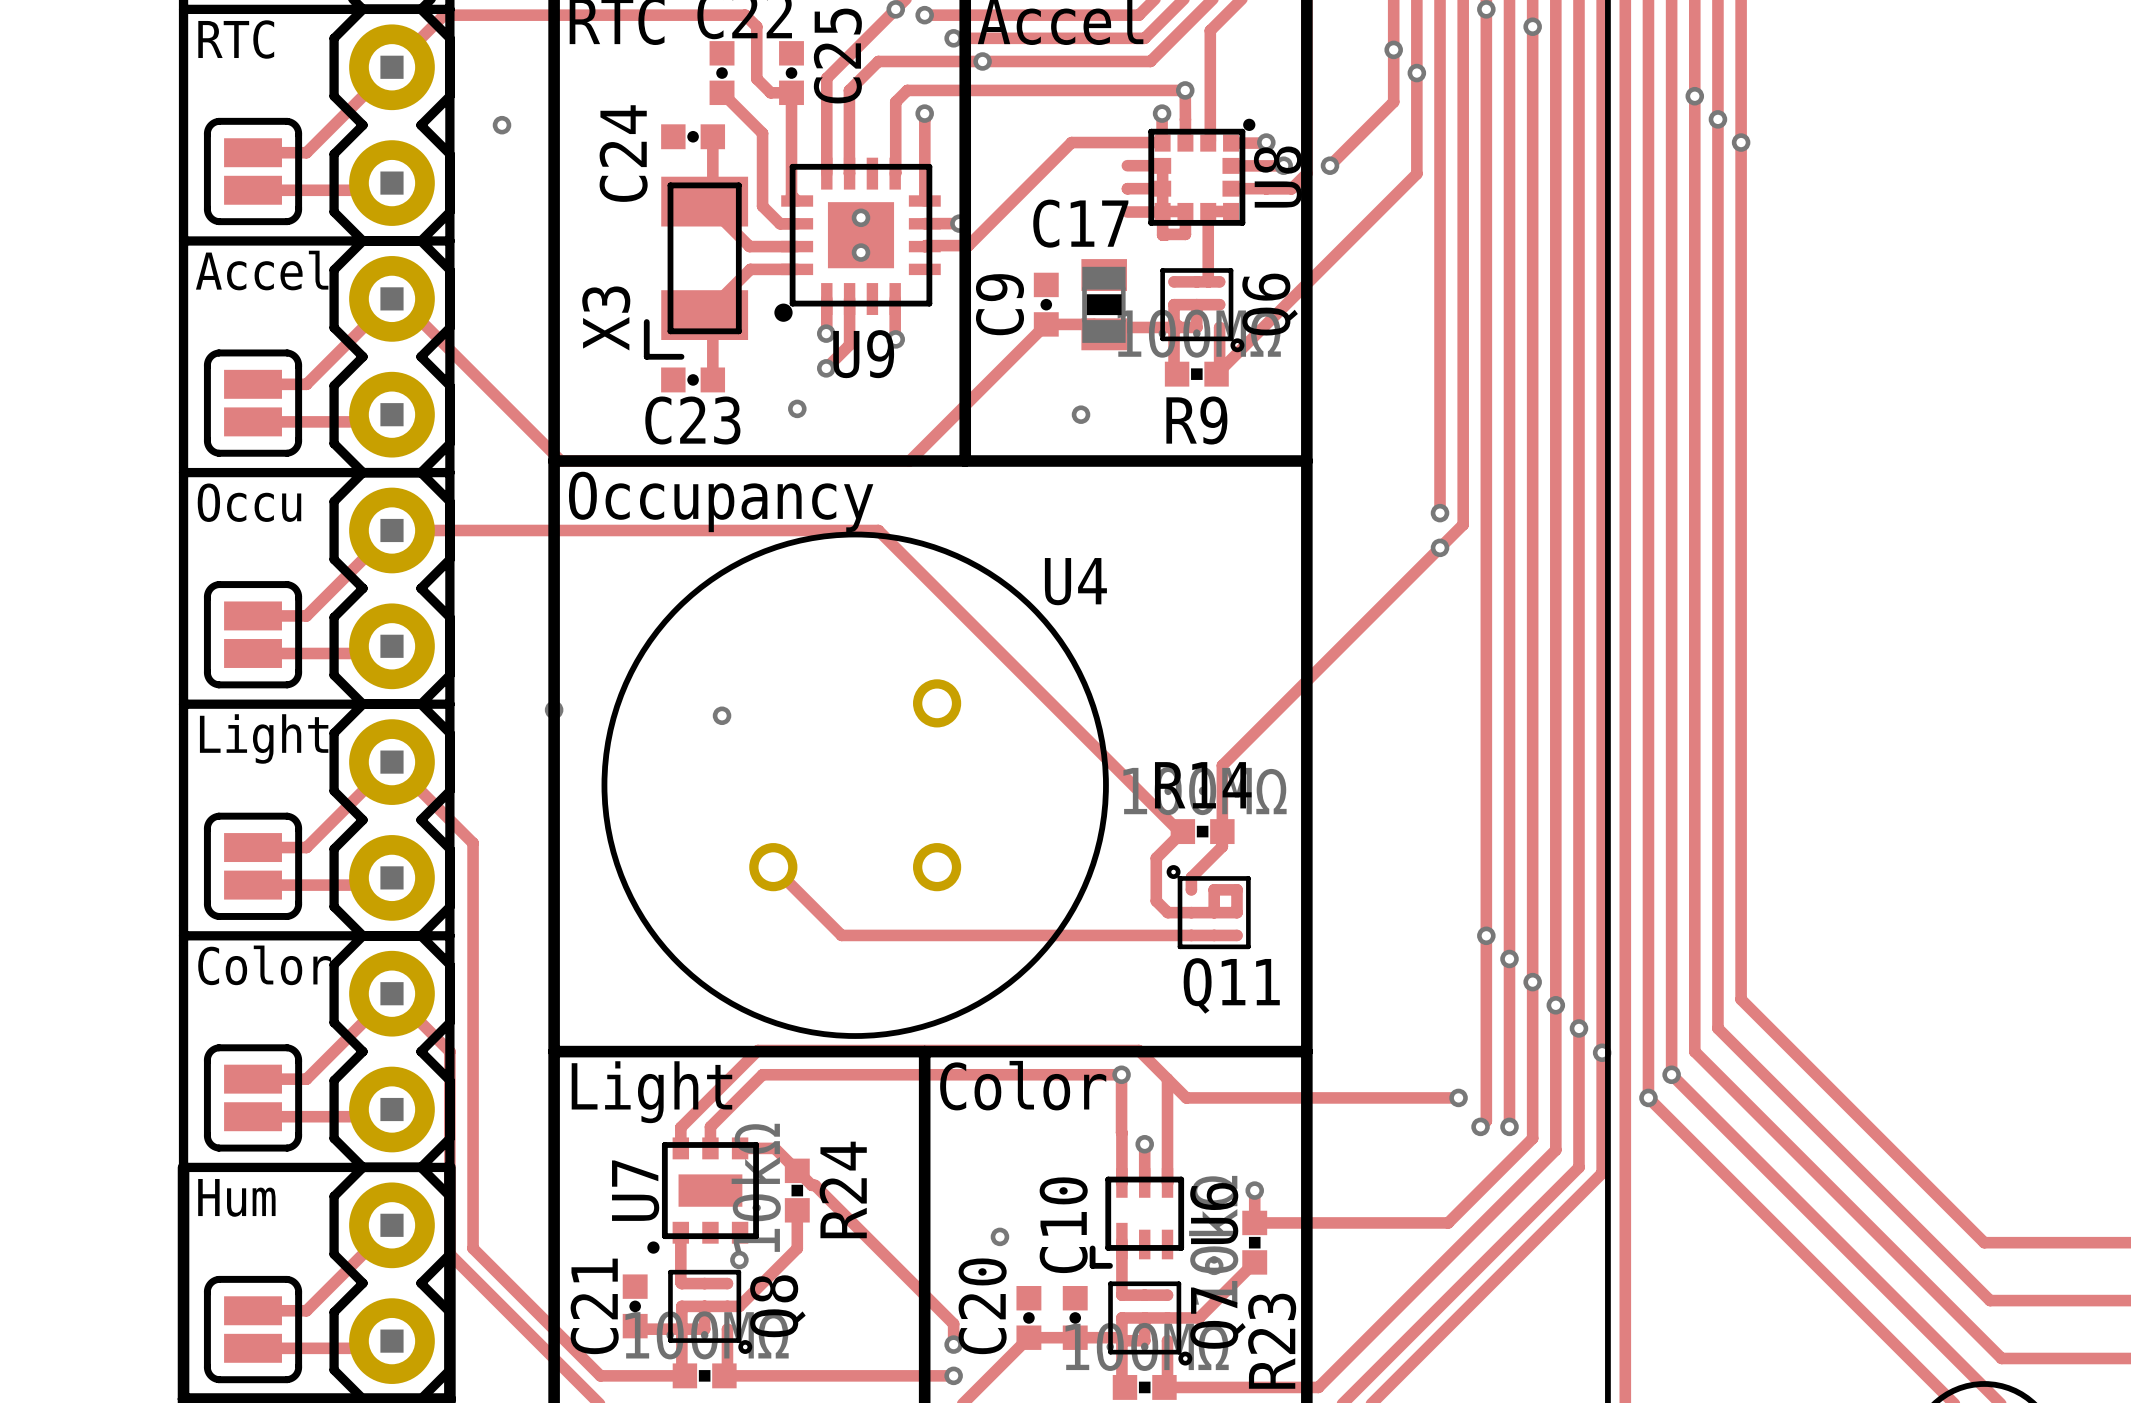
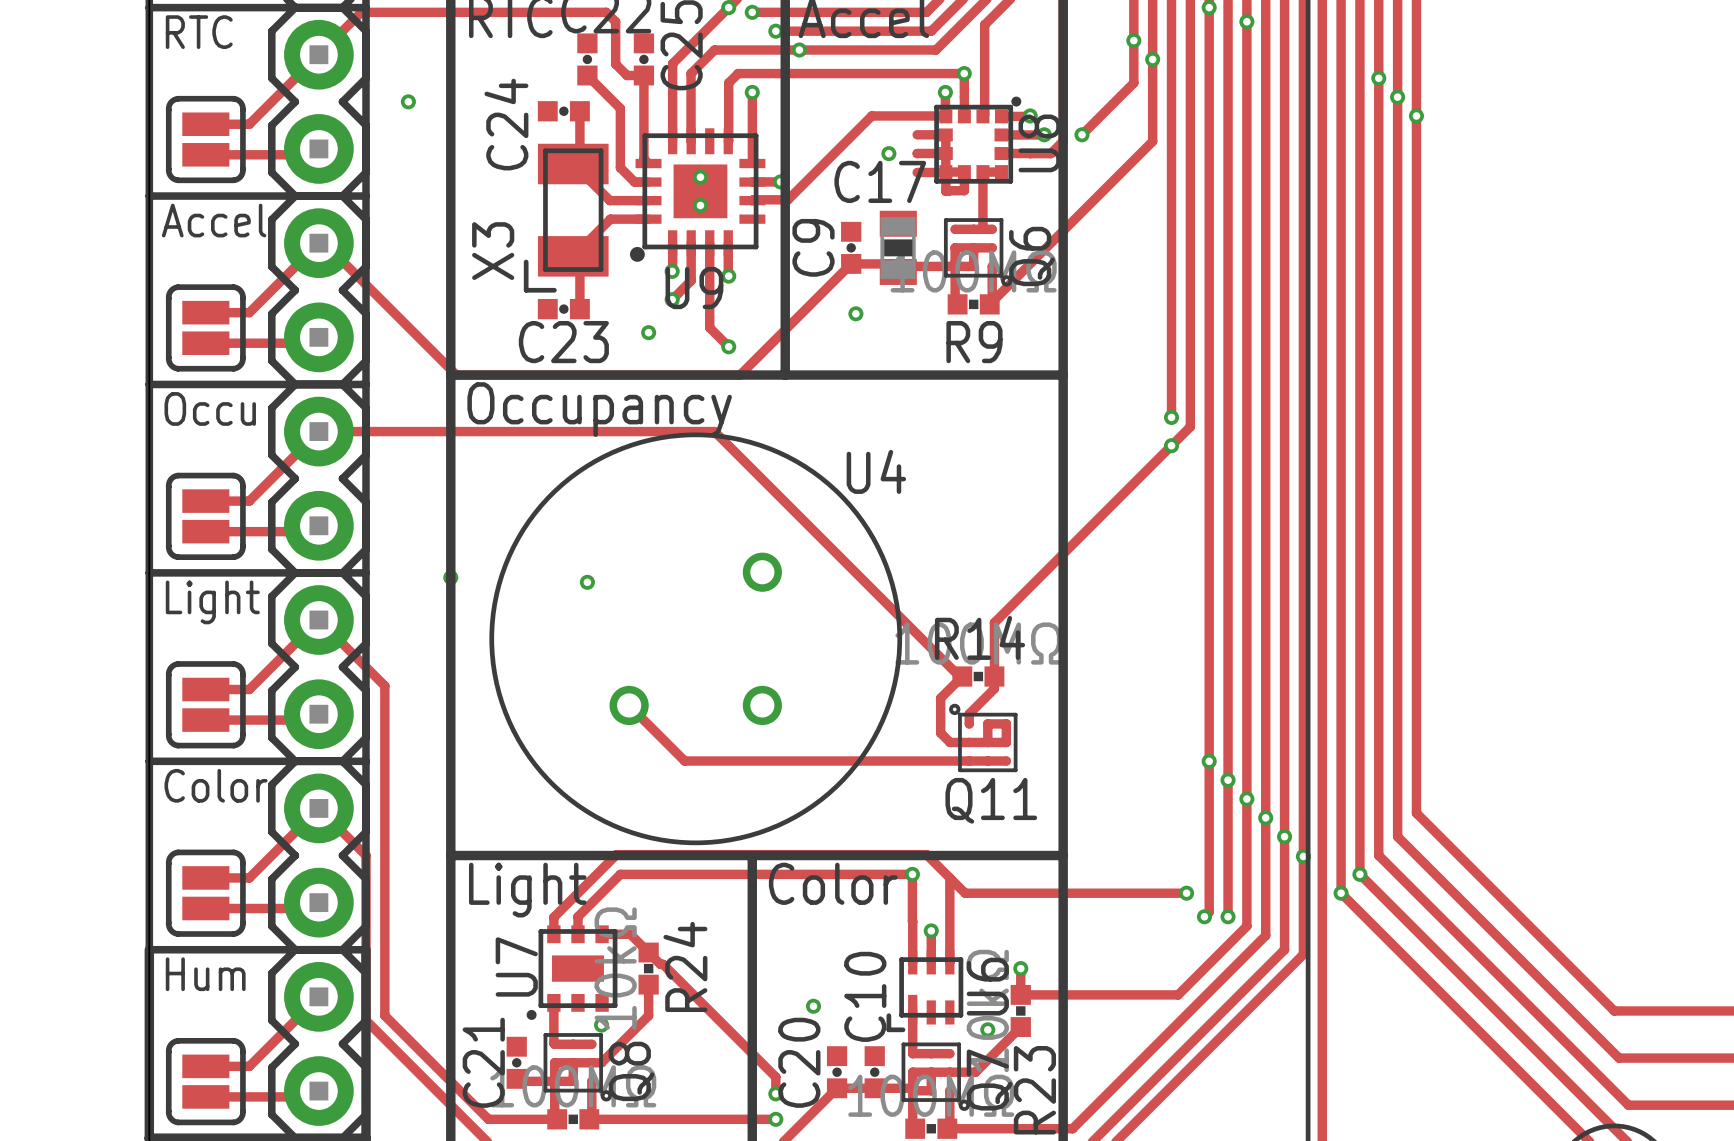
via: none -> (888, 153)
track: none -> (709, 243) (709, 327) (728, 346)
via position: (1081, 414) -> (855, 313)
via: none -> (728, 346)

